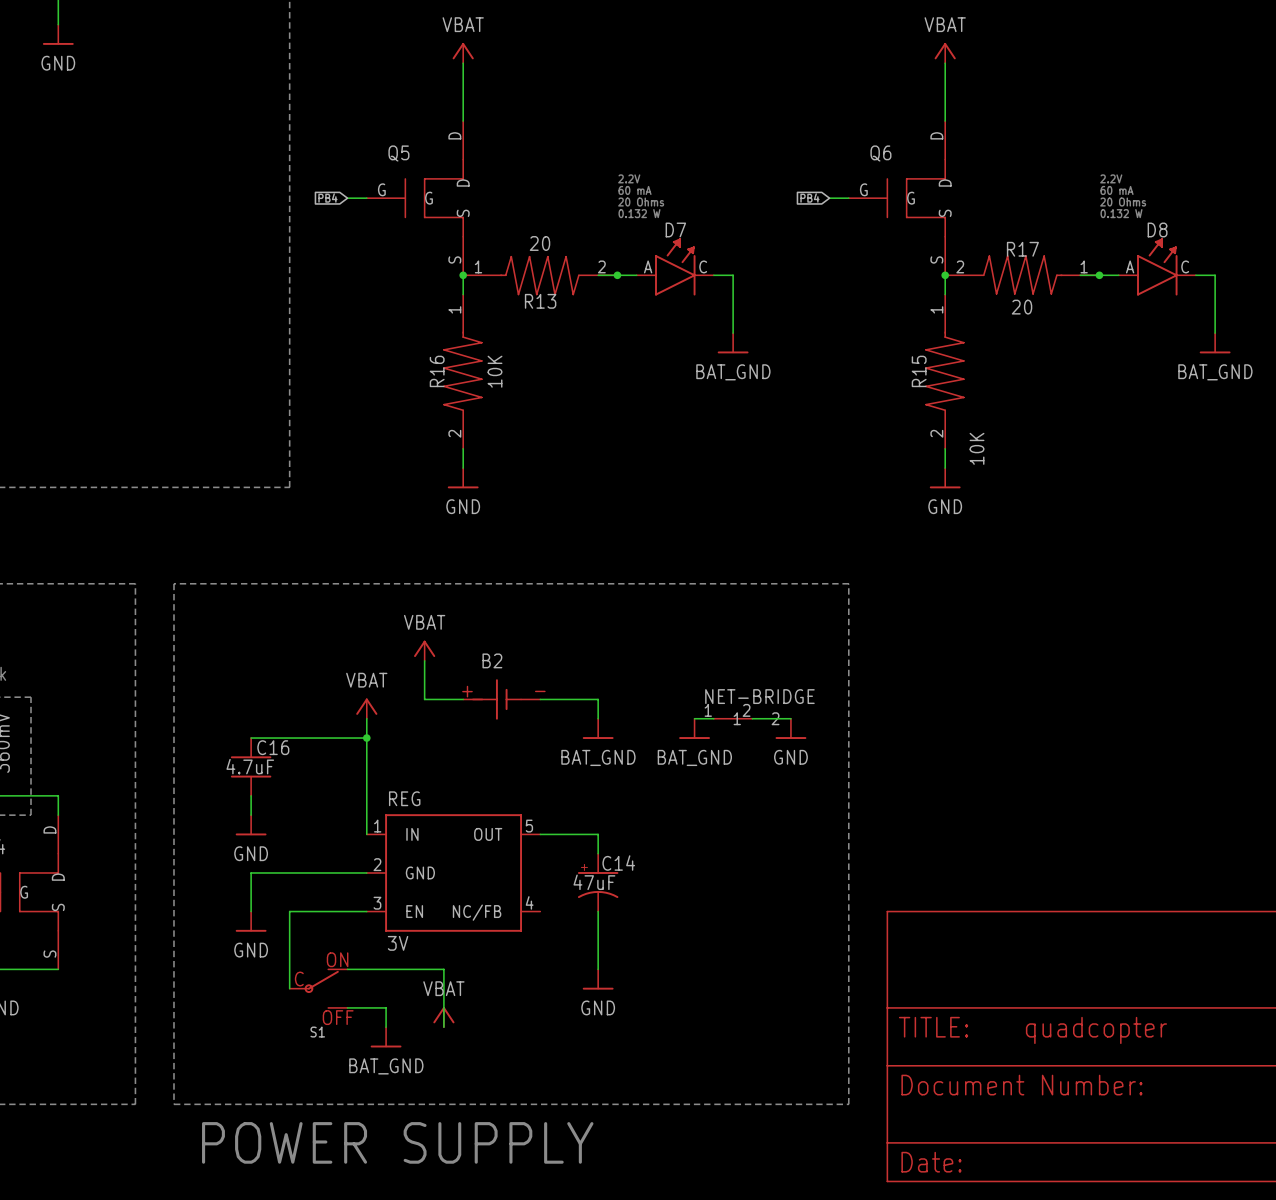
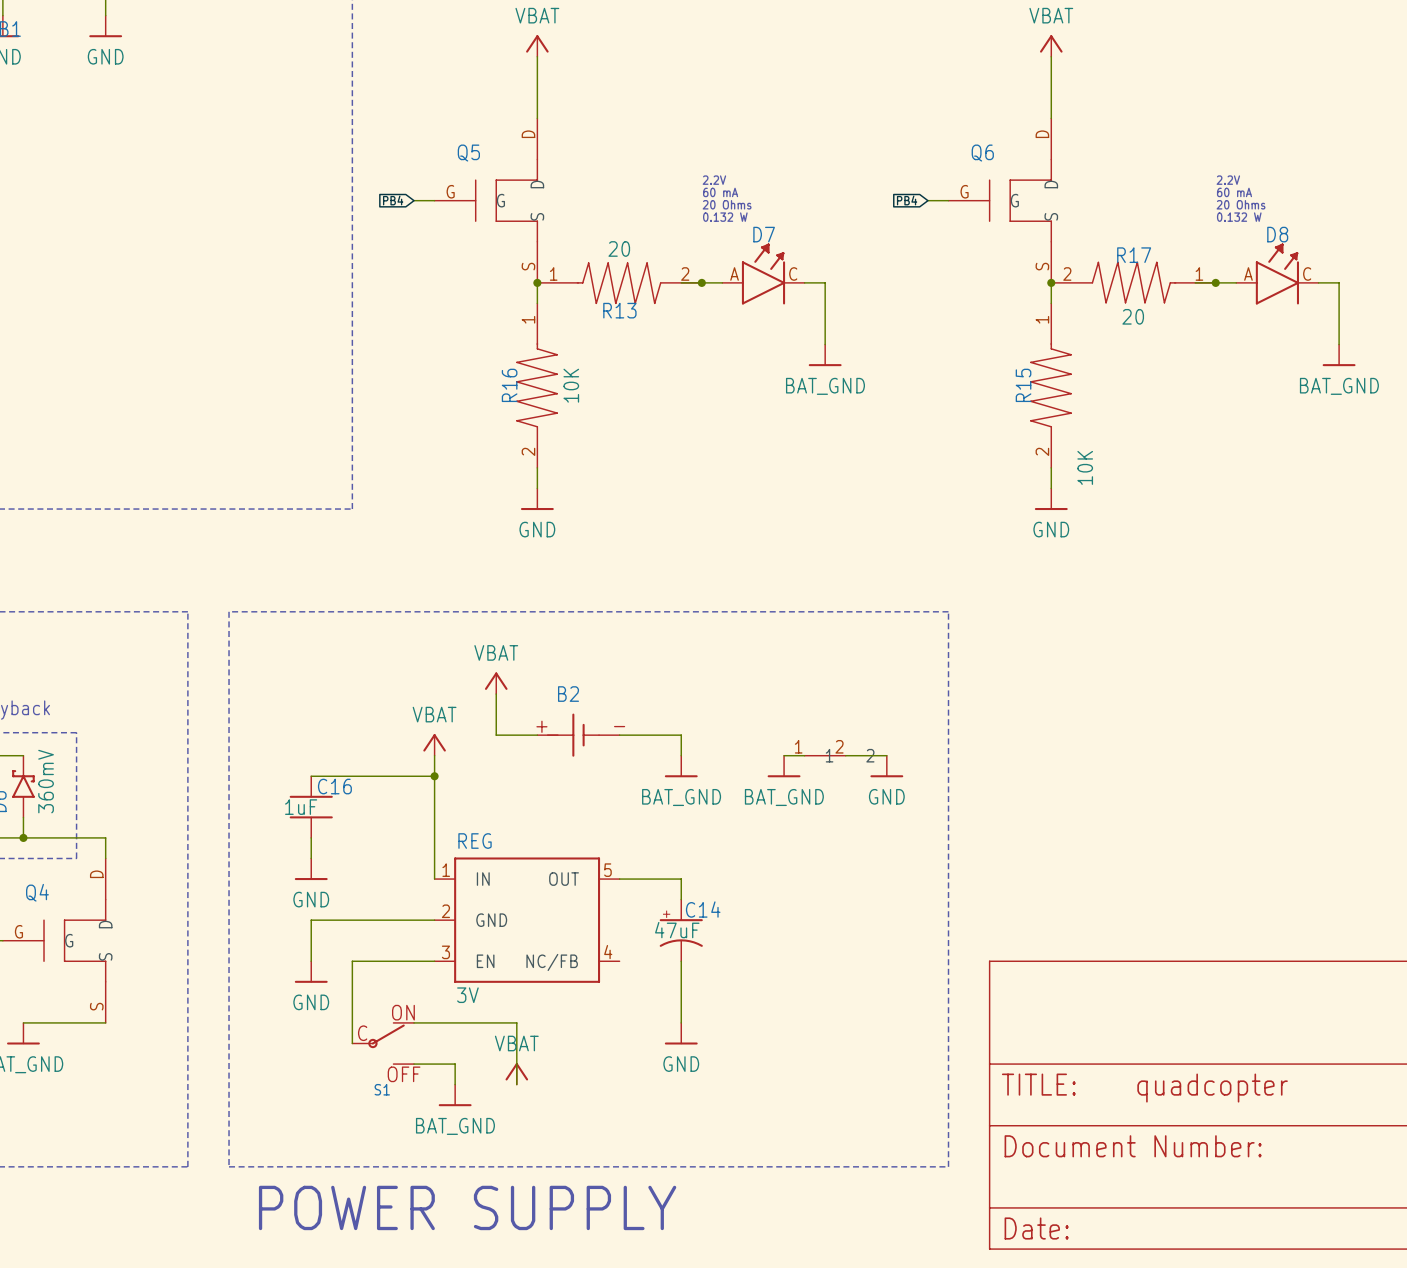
NET-BRIDGE name: NET-BRIDGE (759, 696) -> none
C16 value: 4.7uF (250, 766) -> 1uF (301, 807)

